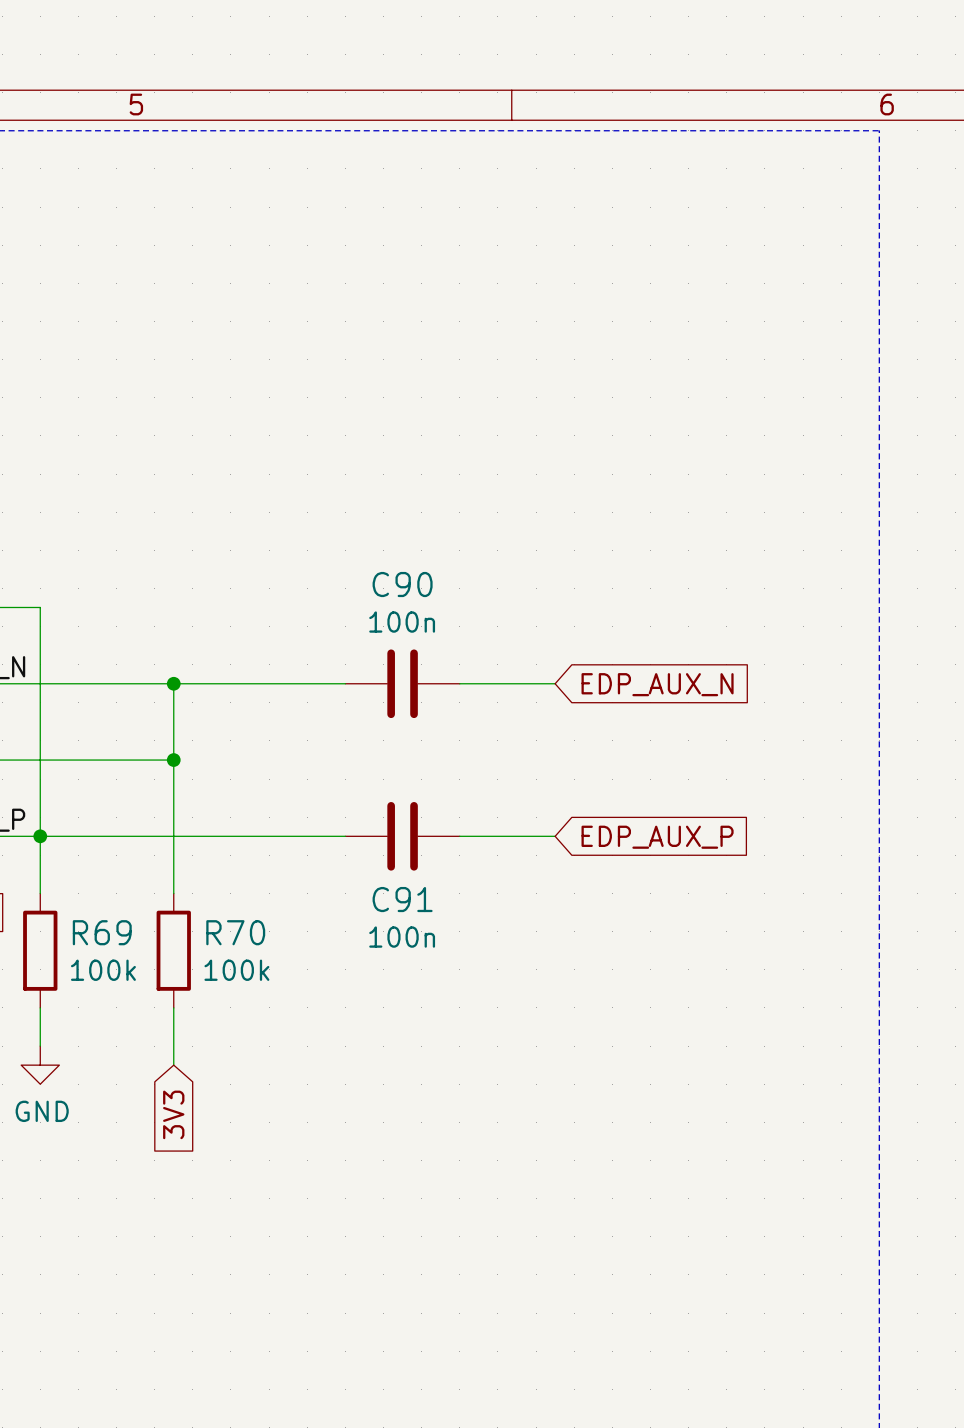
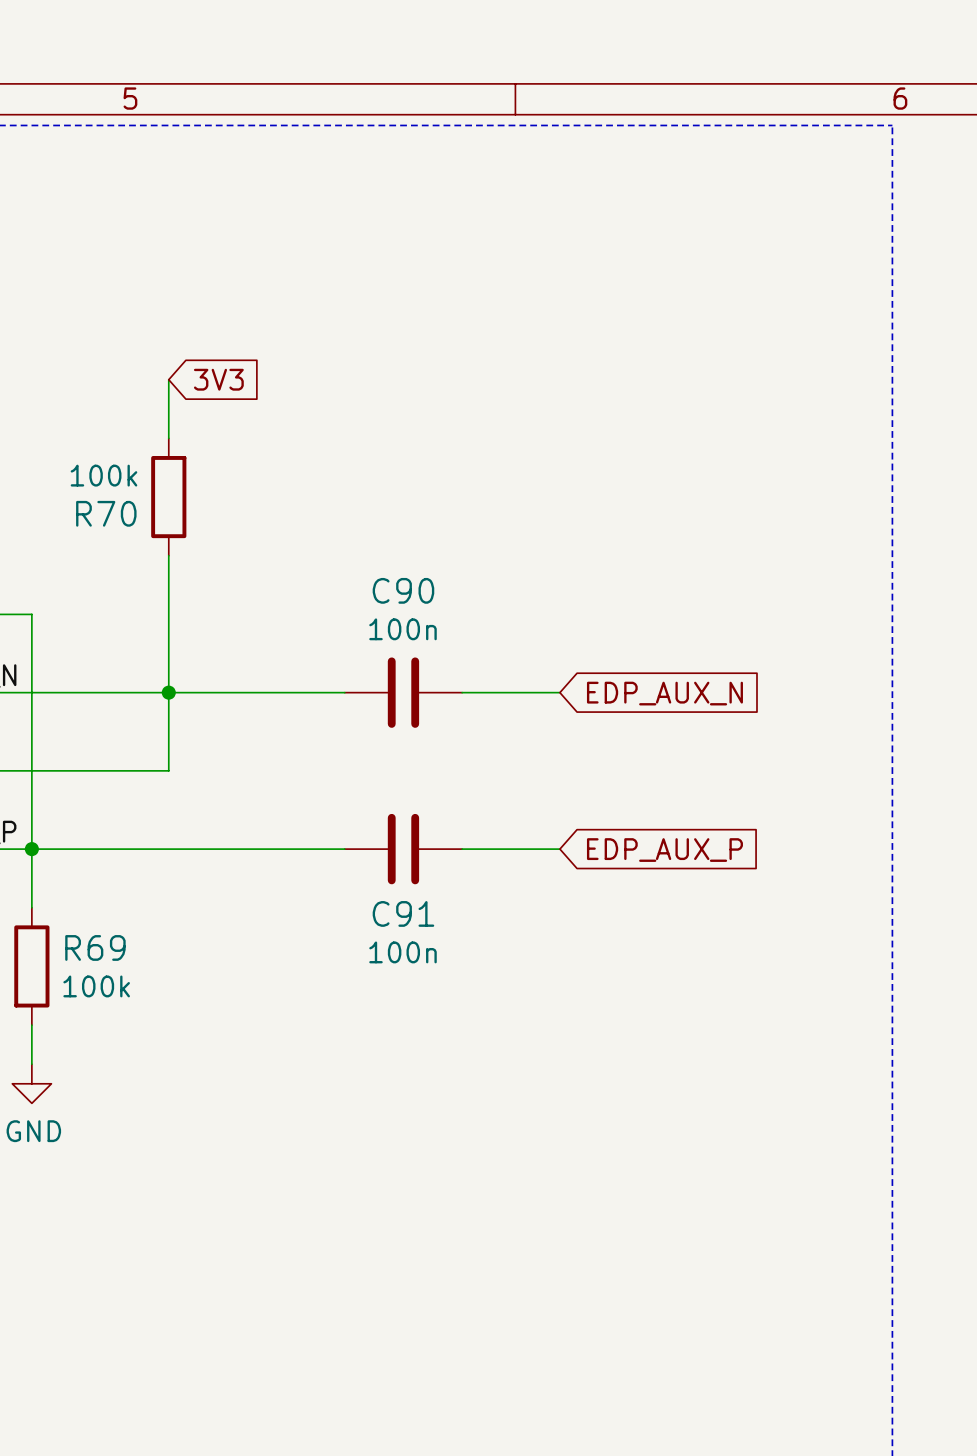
wire: none -> (168, 379) (168, 438)
global label: none -> 3V3 (218, 379)
wire: (173, 760) (173, 893) -> (168, 555) (168, 692)
junction: (173, 760) -> none
R70 name position: R70 (235, 932) -> R70 (106, 513)
R70 position: (173, 950) -> (168, 497)
R70 text position: 100k (236, 970) -> 100k (103, 475)
wire: (173, 1007) (173, 1065) -> none
global label: 3V3 (173, 1114) -> none

